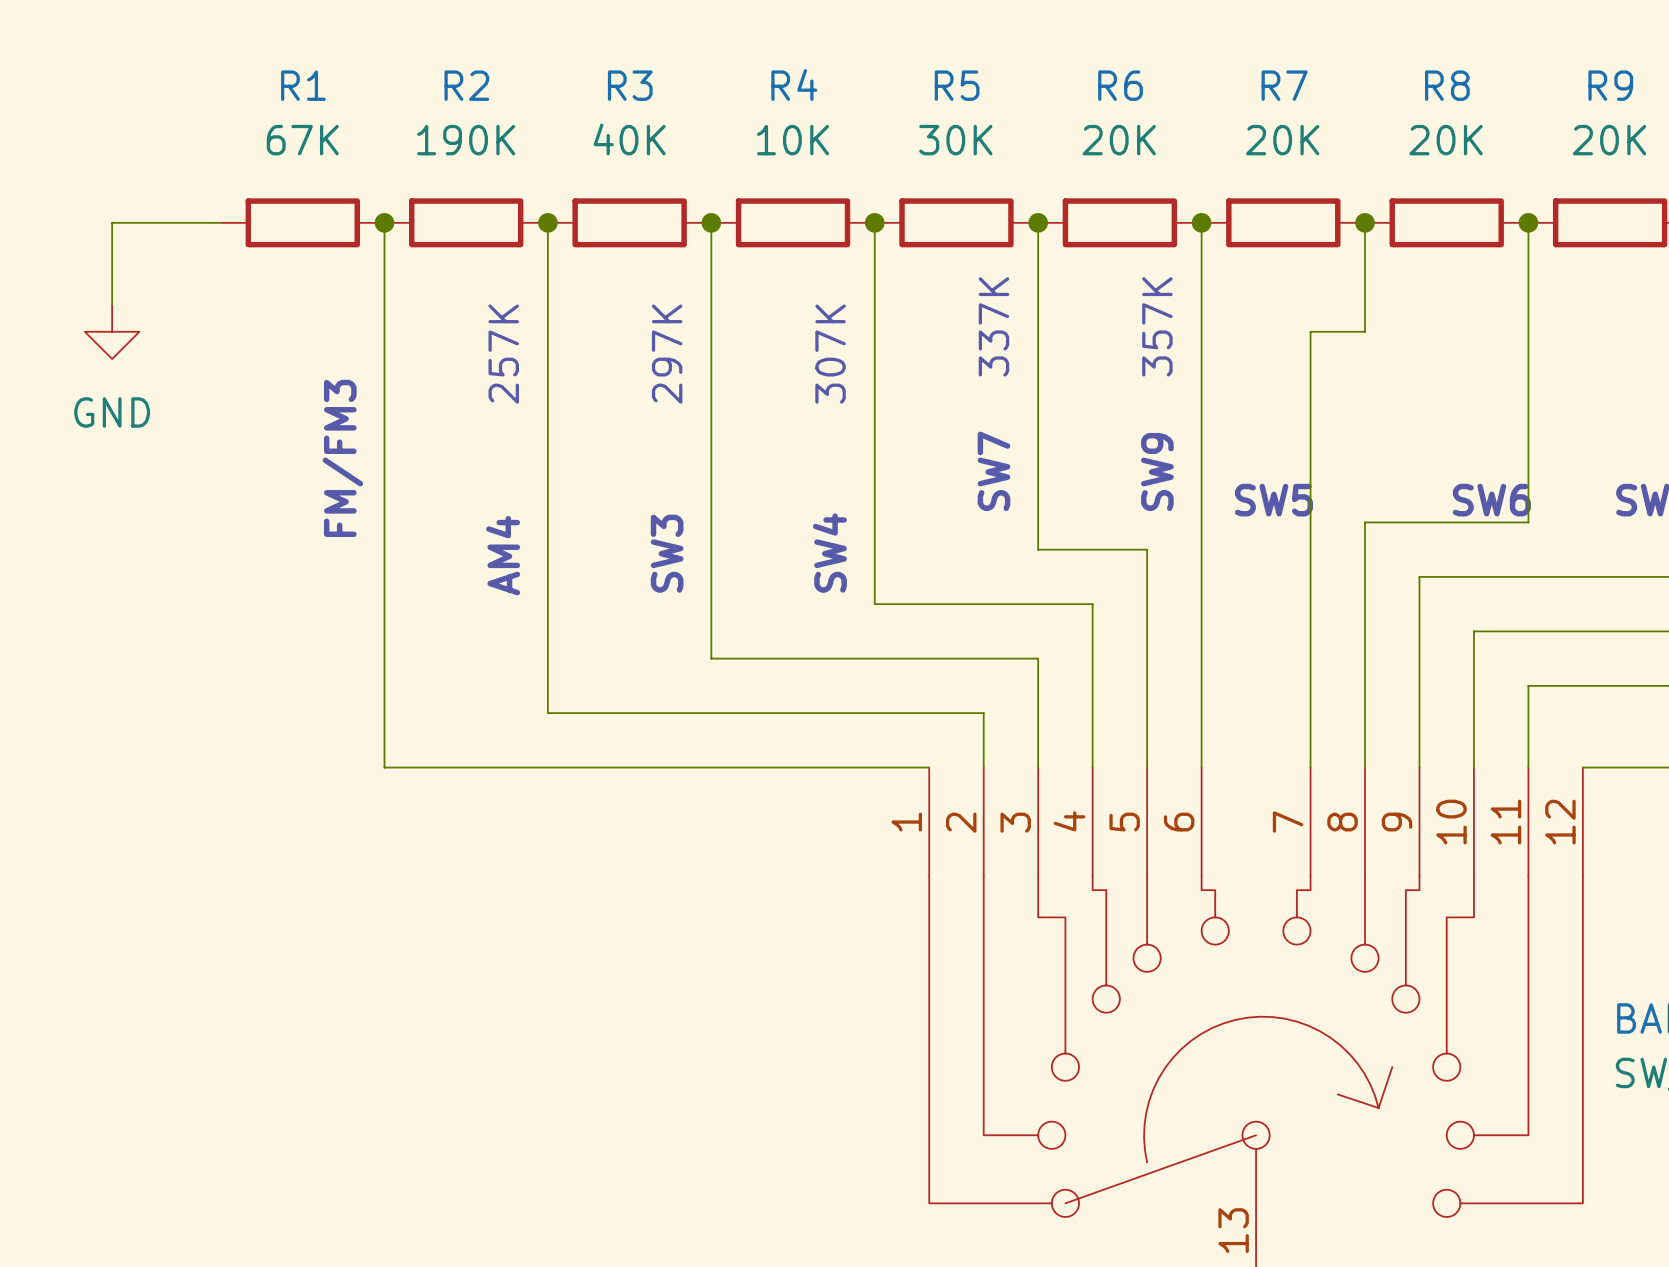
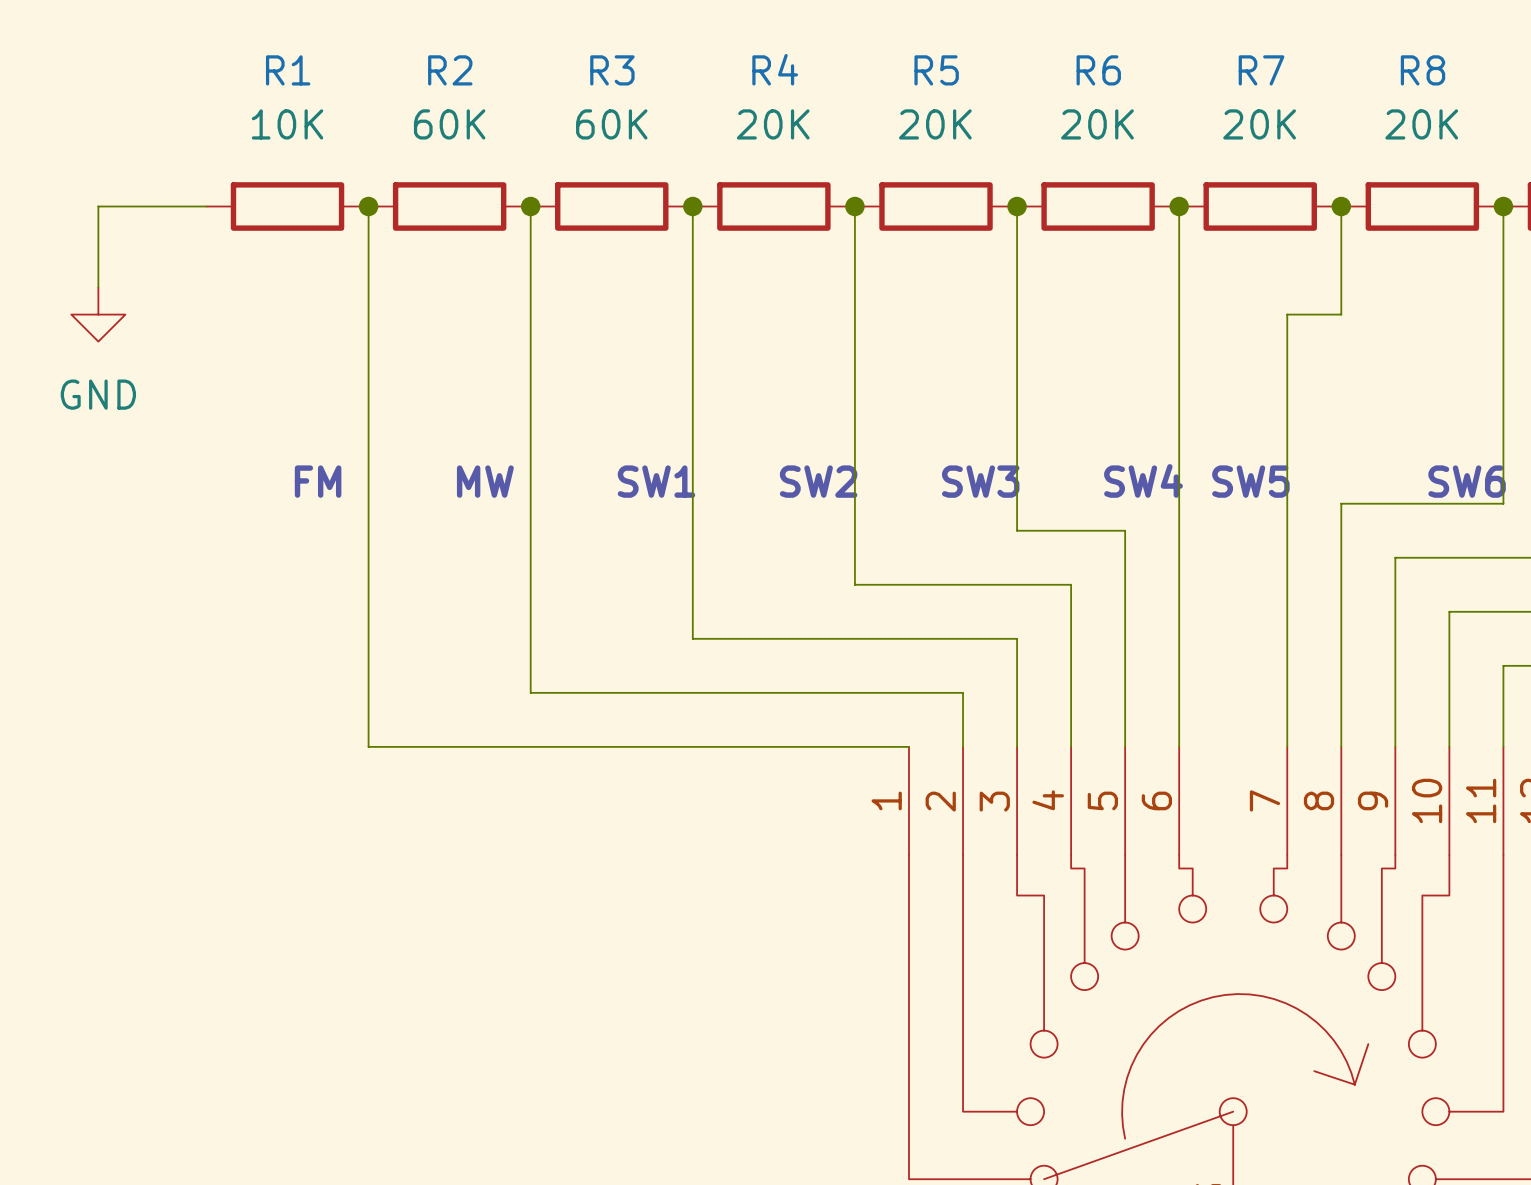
R3 value: 40K (629, 139) -> 60K (611, 124)
R1 value: 67K (302, 140) -> 10K (287, 124)
R2 value: 190K (466, 140) -> 60K (449, 124)
R4 value: 10K (793, 140) -> 20K (773, 124)
R5 value: 30K (955, 140) -> 20K (935, 124)
text: 337K (993, 326) -> none
text: 357K (1157, 326) -> none
text: 257K (503, 354) -> none
text: 297K (667, 354) -> none
text: 307K (830, 354) -> none
text: FM/FM3 (342, 458) -> none
text: SW7 (993, 471) -> none
text: SW9 (1157, 472) -> none
text: none -> FM (318, 481)
text: none -> MW (485, 481)
text: none -> SW1 (656, 481)
text: none -> SW2 (818, 481)
text rotation: 0° (667, 553) -> 90° clockwise (980, 481)
text position: SW3 (667, 553) -> SW3 (980, 481)
text rotation: 0° (829, 553) -> 90° clockwise (1143, 480)
text position: SW4 (829, 553) -> SW4 (1143, 480)
text: AM4 (503, 555) -> none

